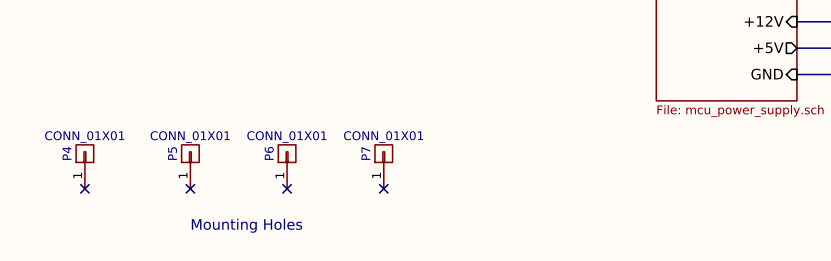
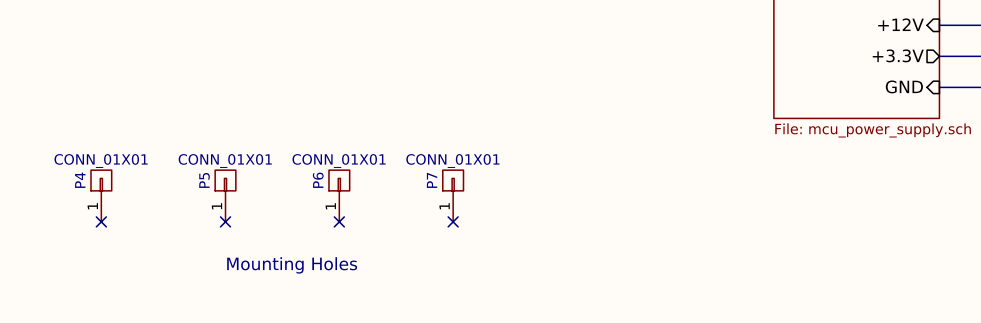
sheet pin: +5V (768, 47) -> +3.3V (898, 55)

